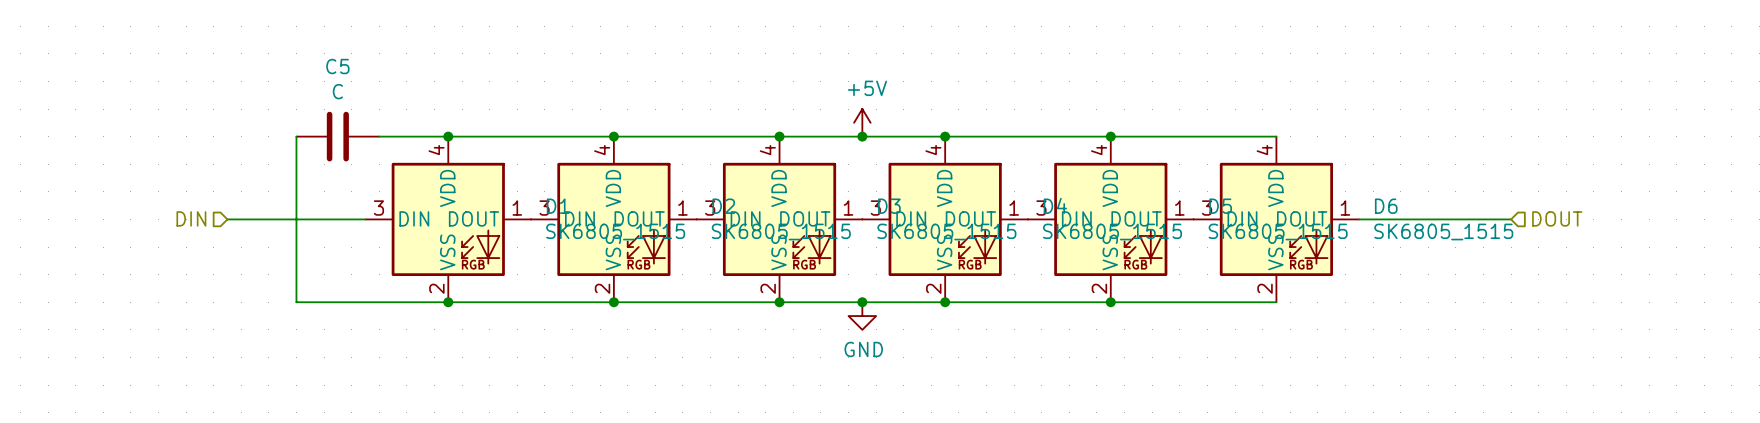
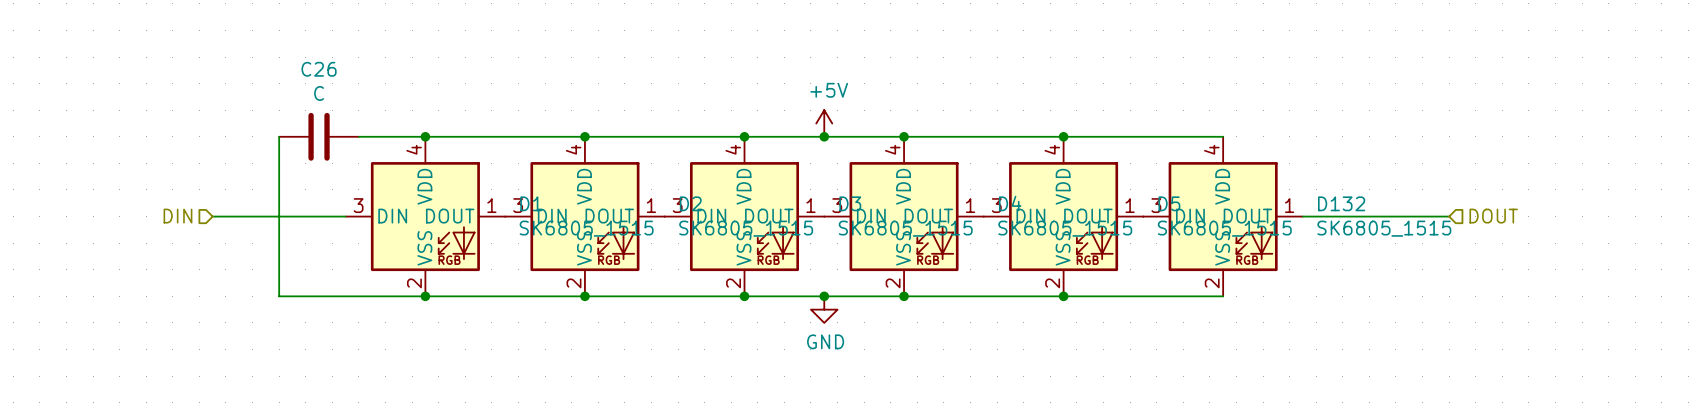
C5 name: C5 (337, 66) -> C26 (319, 69)
D6 name: D6 (1386, 206) -> D132 (1341, 203)

